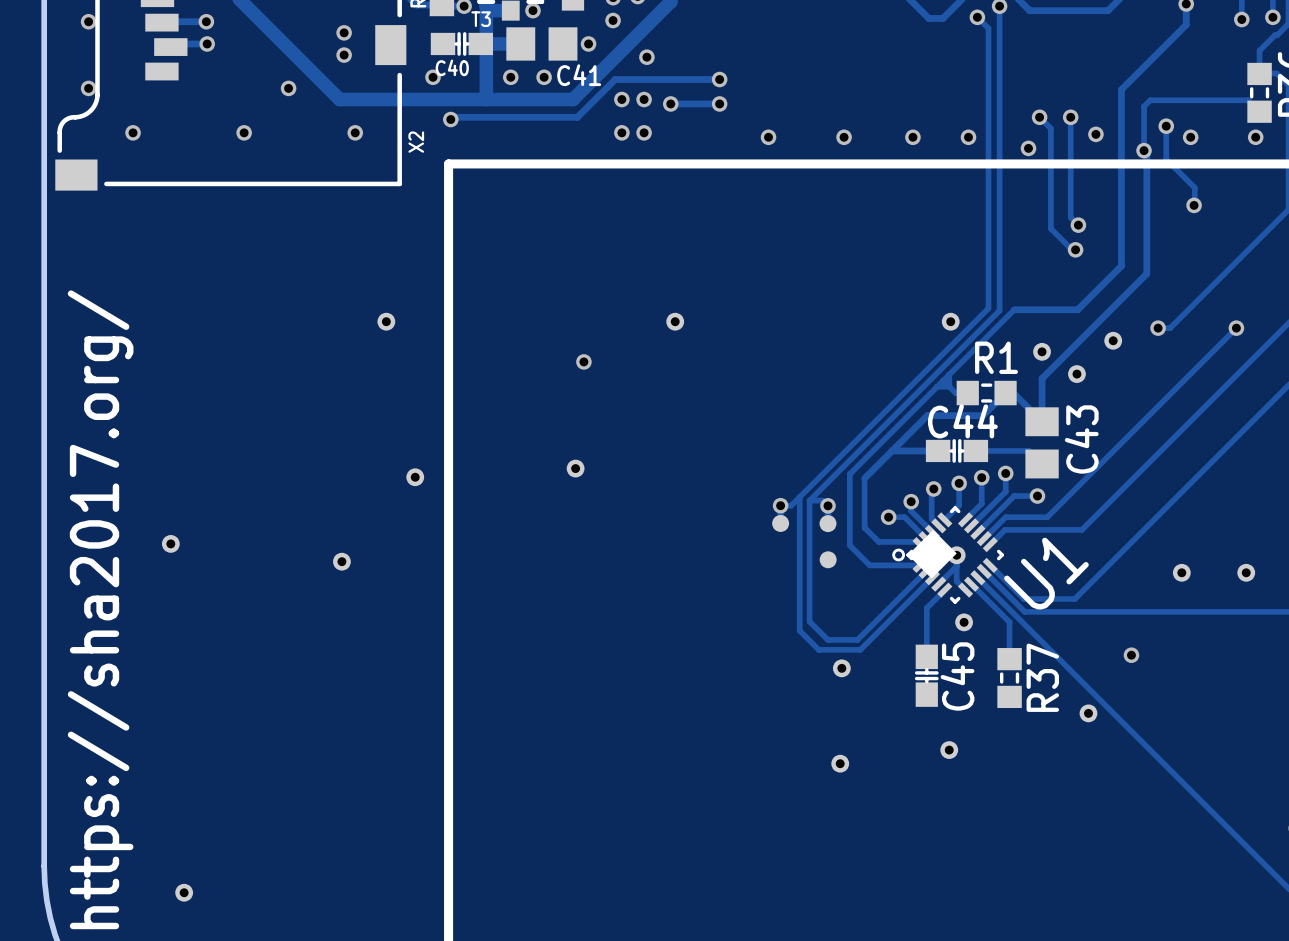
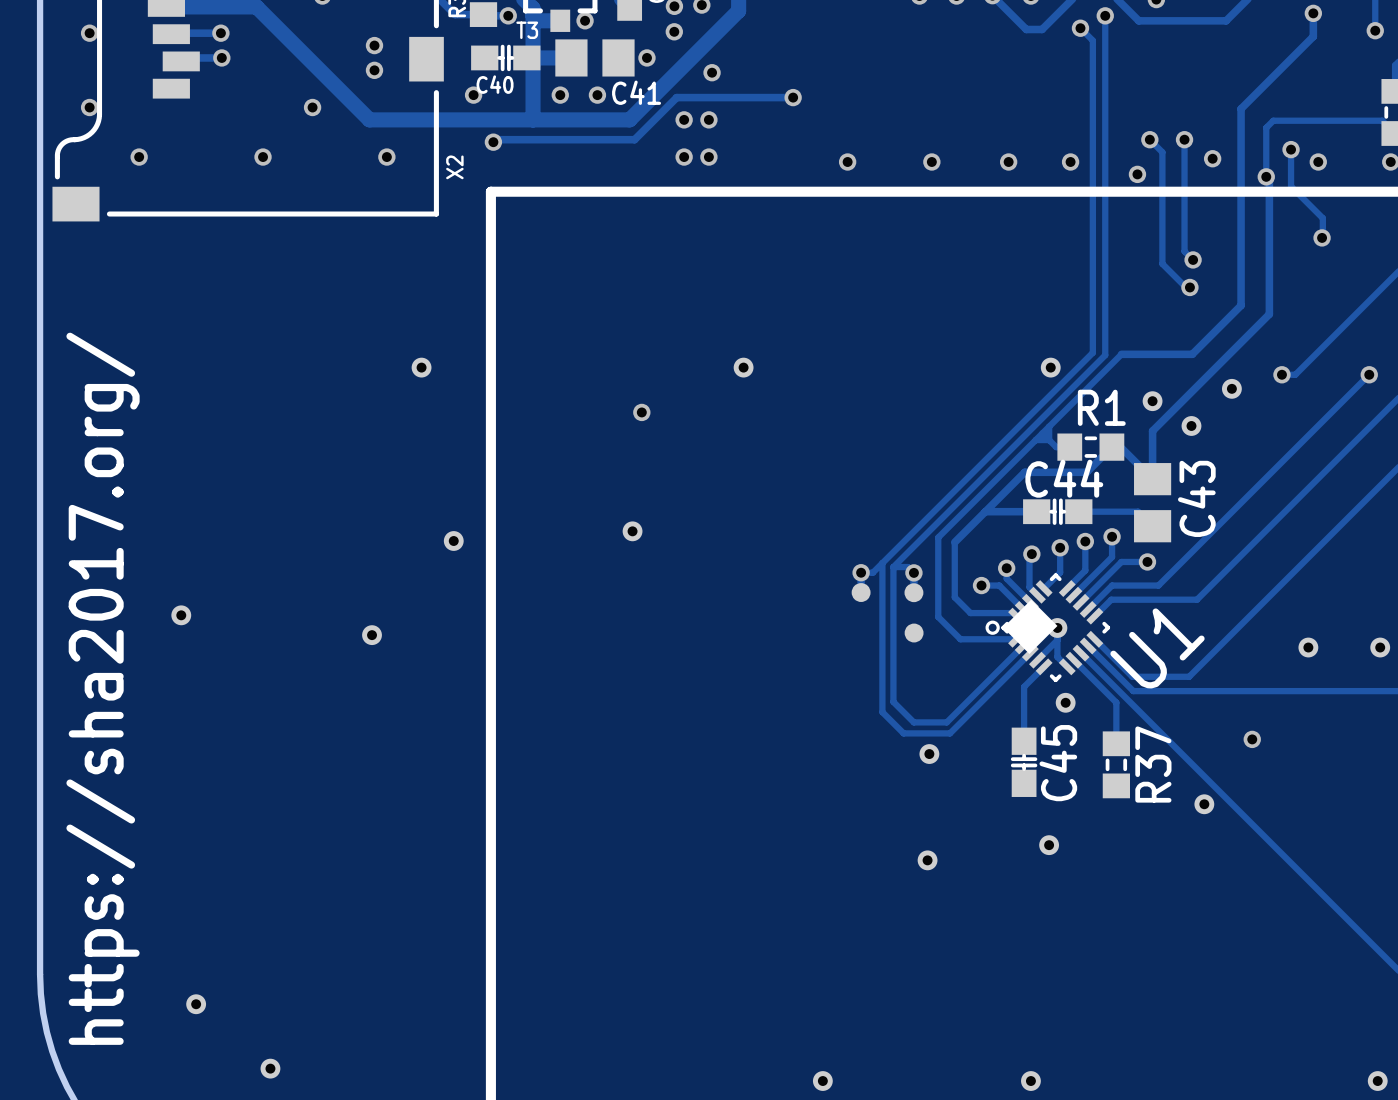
track: (670, 103) (719, 103) -> none
via: (670, 103) -> none
via: (719, 103) -> none

